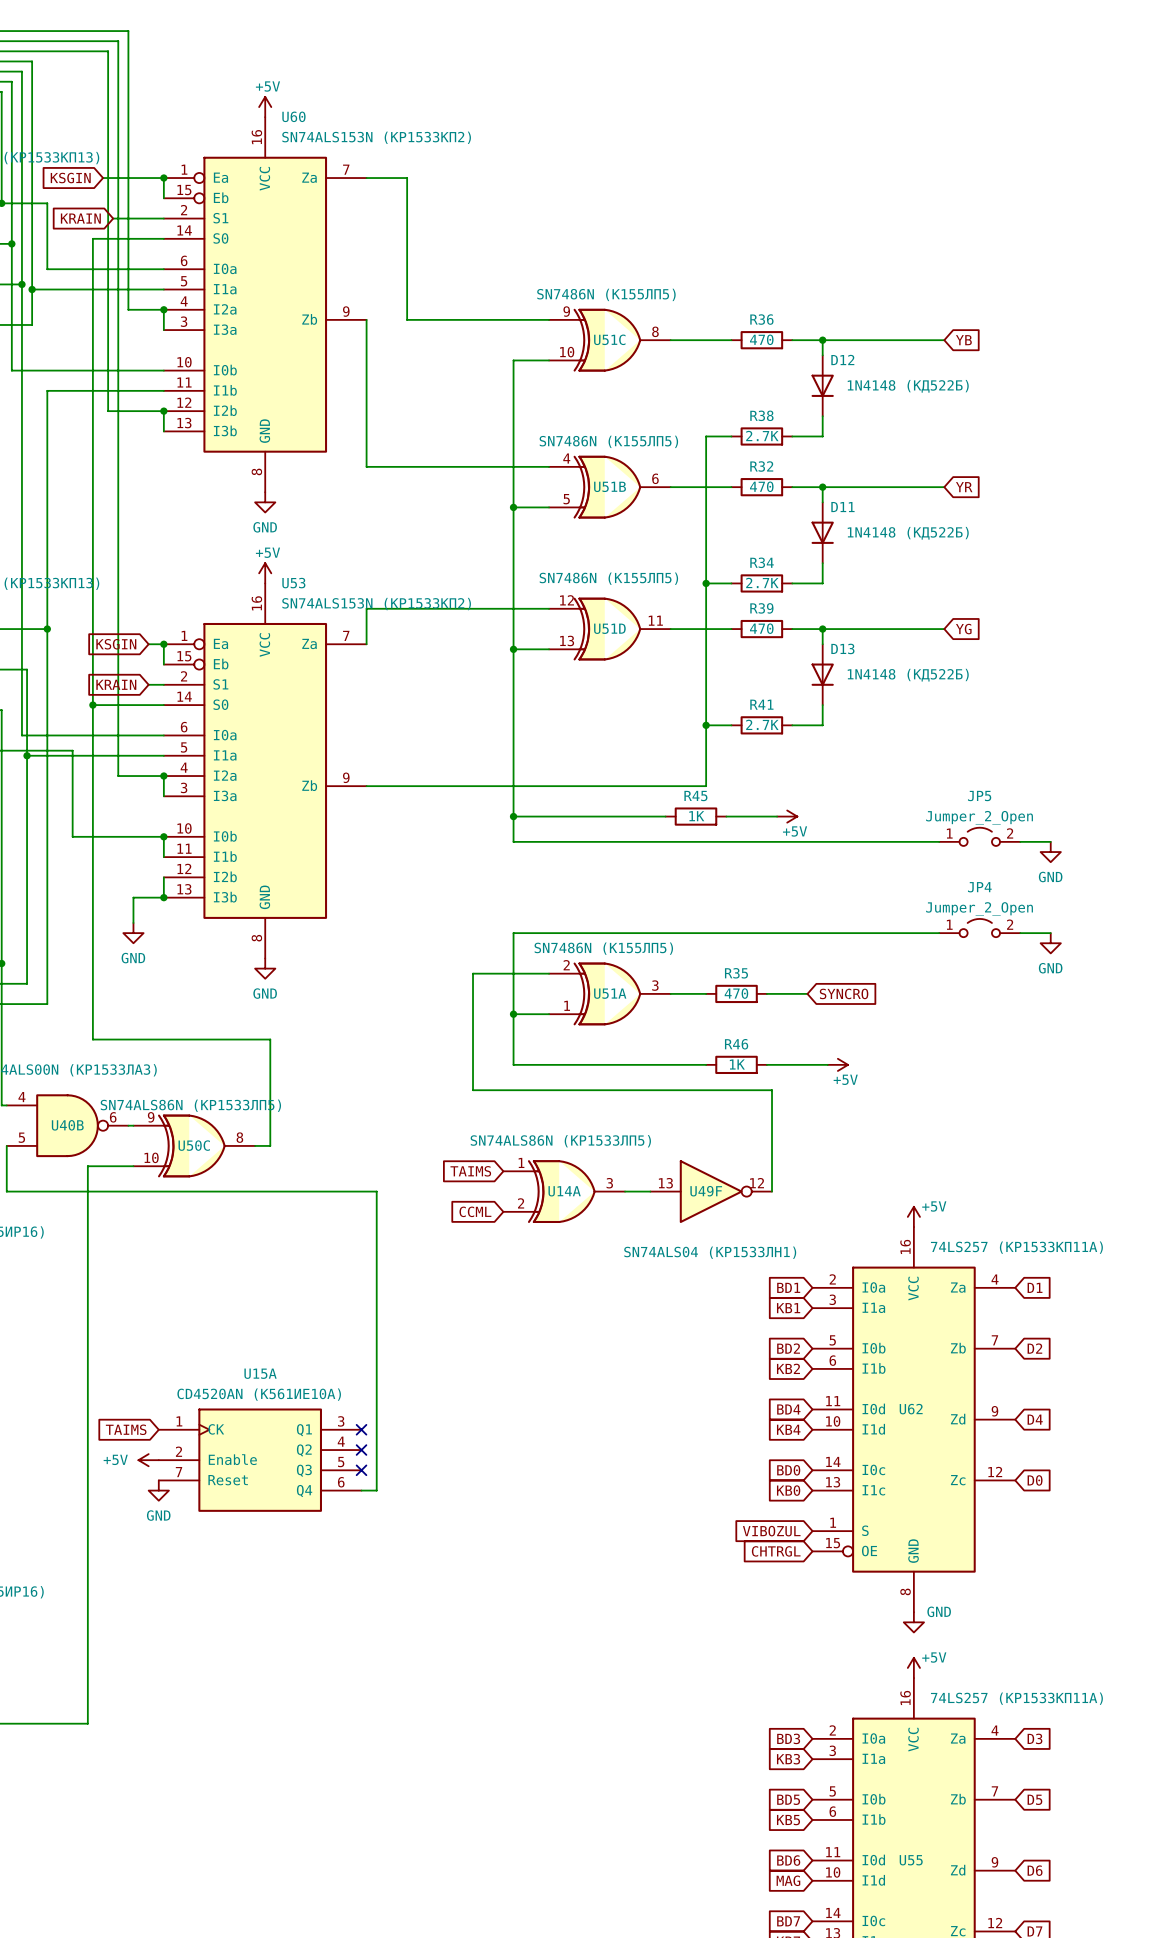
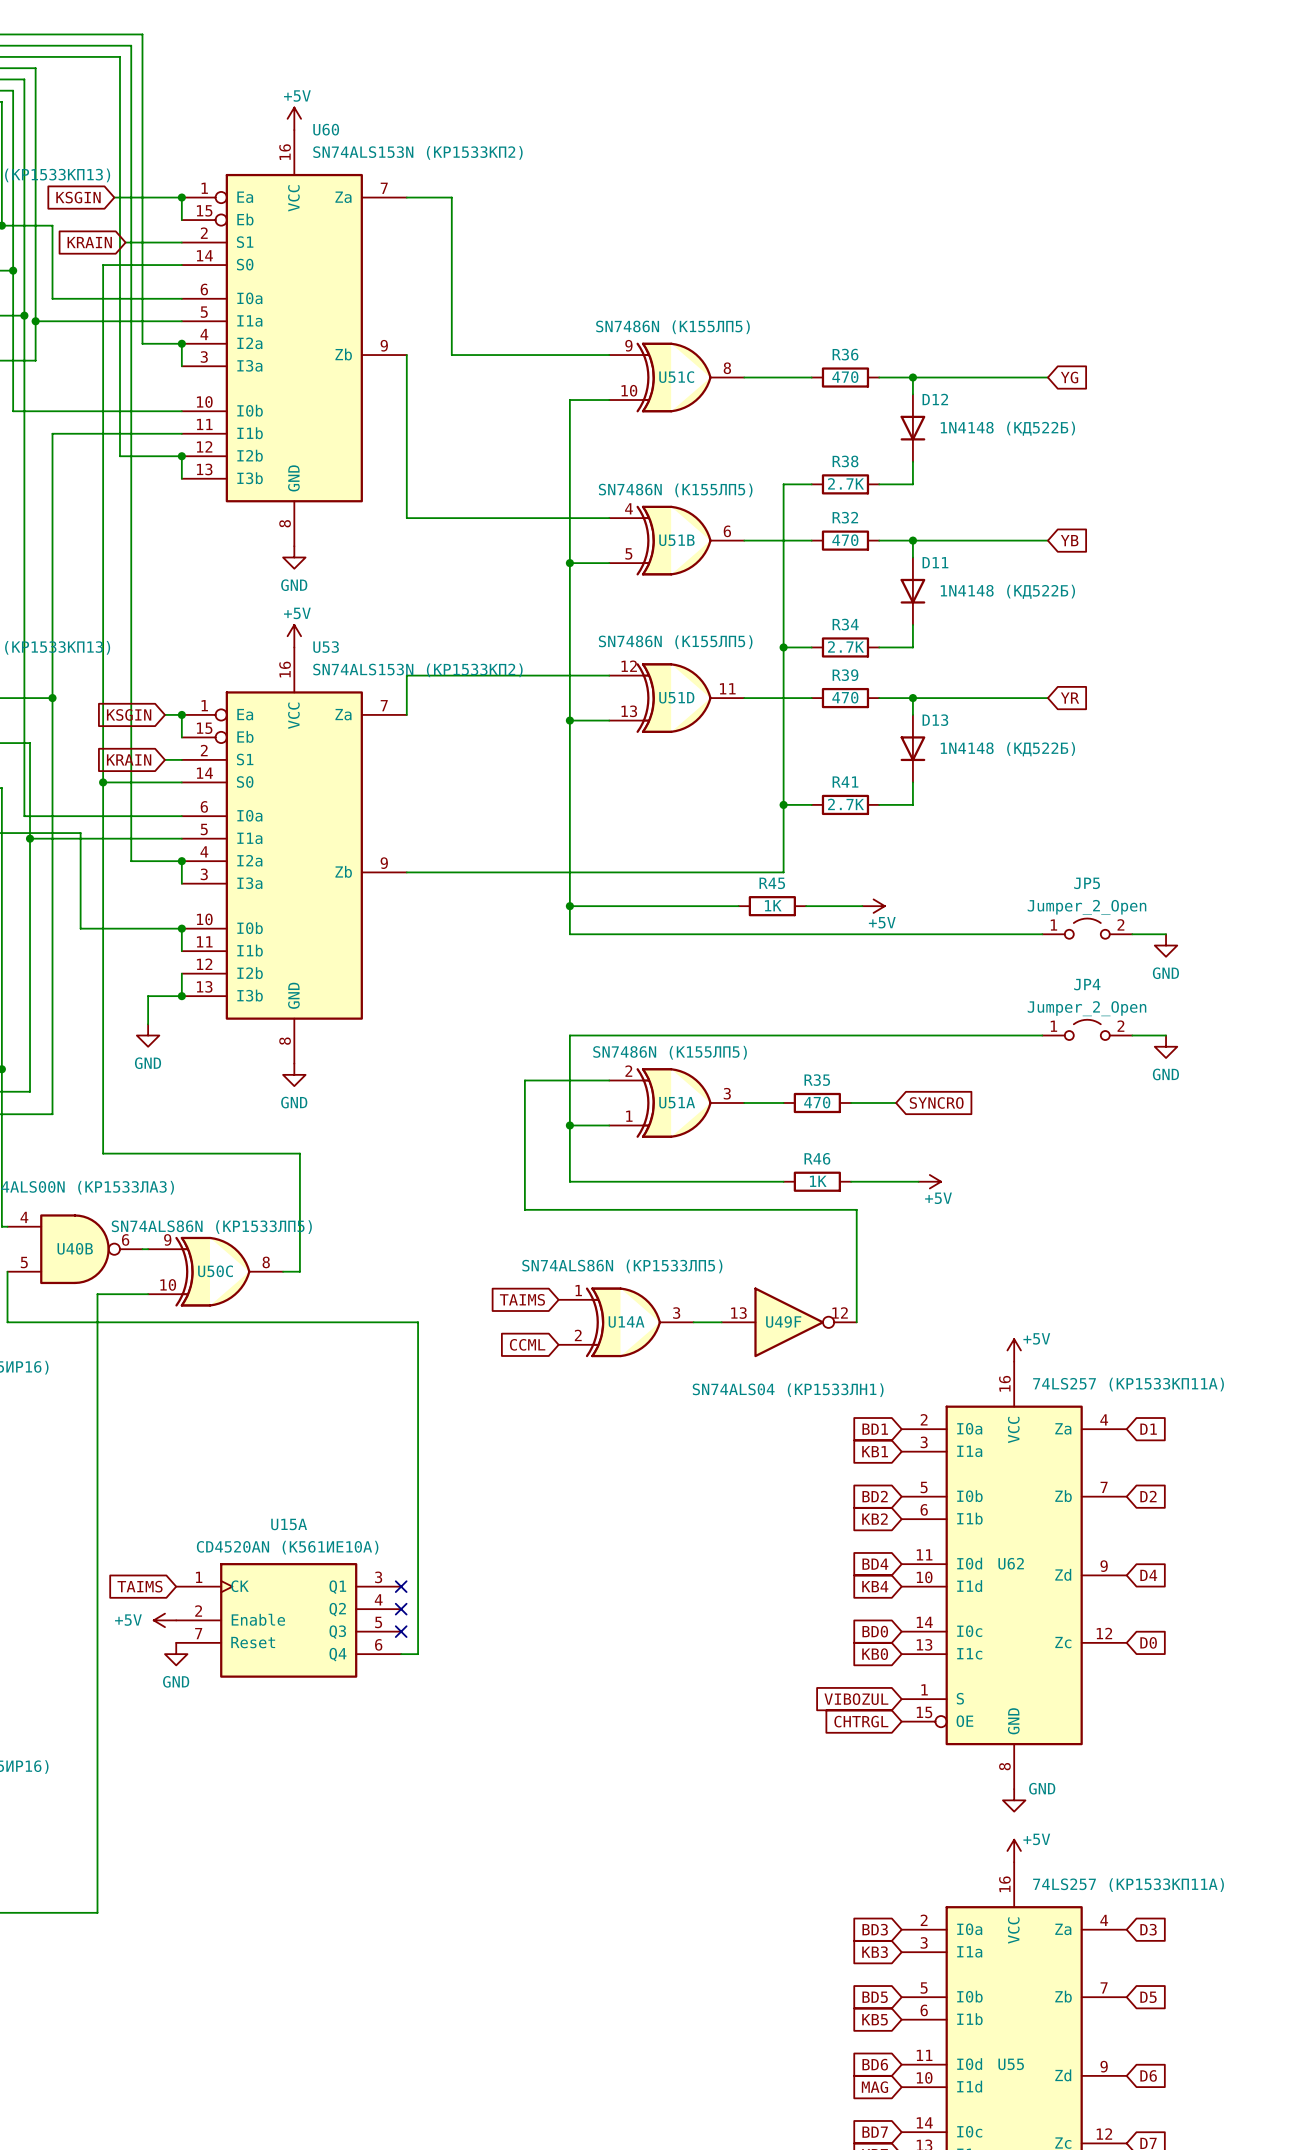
global label: YB (963, 340) -> YG (1069, 377)
global label: YR (964, 487) -> YB (1069, 540)
global label: YG (963, 629) -> YR (1070, 698)

